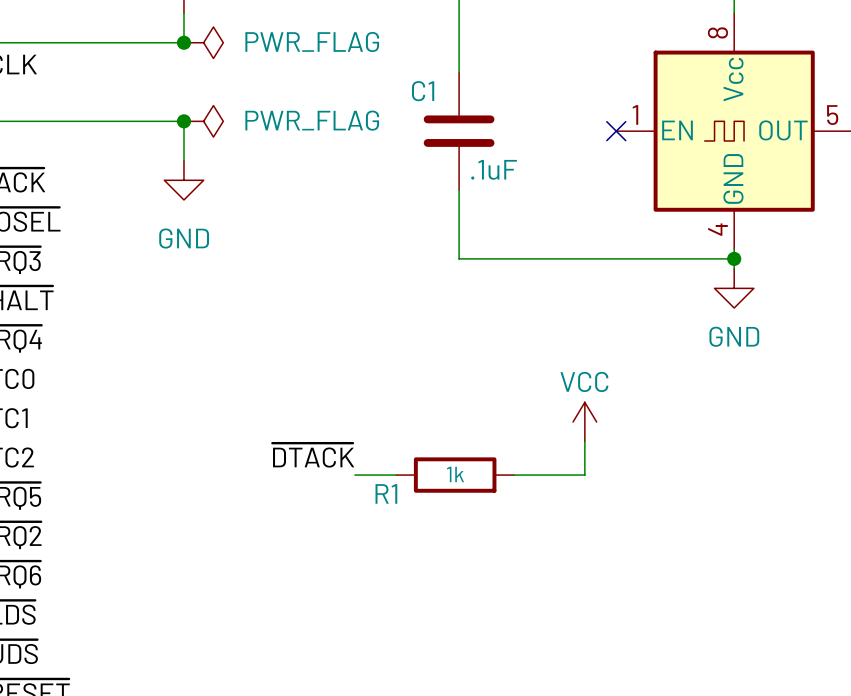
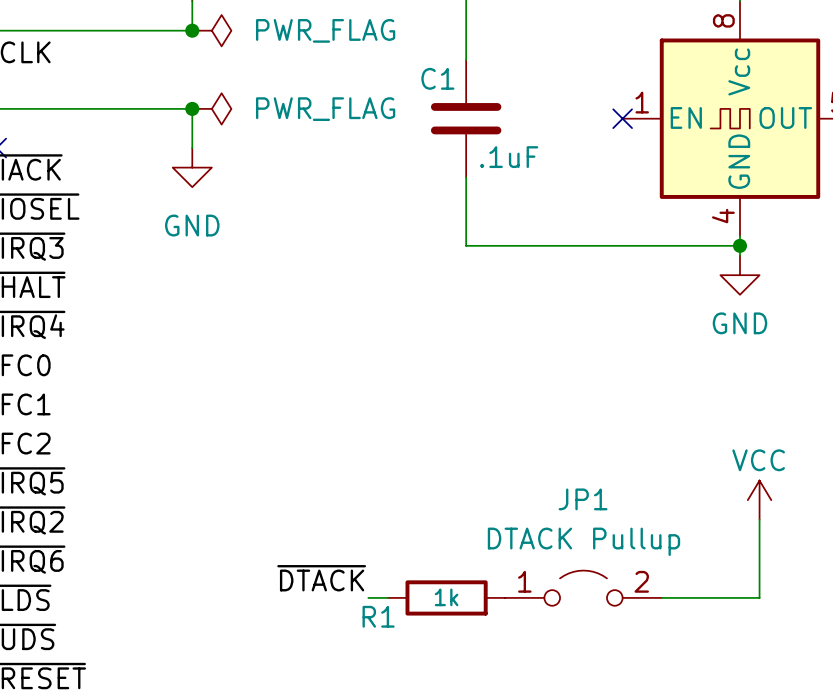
power symbol position: VCC (584, 421) -> VCC (759, 500)
wire: (584, 441) (584, 475) (514, 475) -> none
label position: ~{DTACK} (313, 455) -> ~{DTACK} (321, 578)
wire: (354, 475) (396, 475) -> none
R1 position: (455, 475) -> (446, 597)
wire: none -> (759, 519) (759, 597) (661, 597)
JP1: none -> DTACK Pullup (583, 588)
wire: none -> (368, 597) (387, 597)

